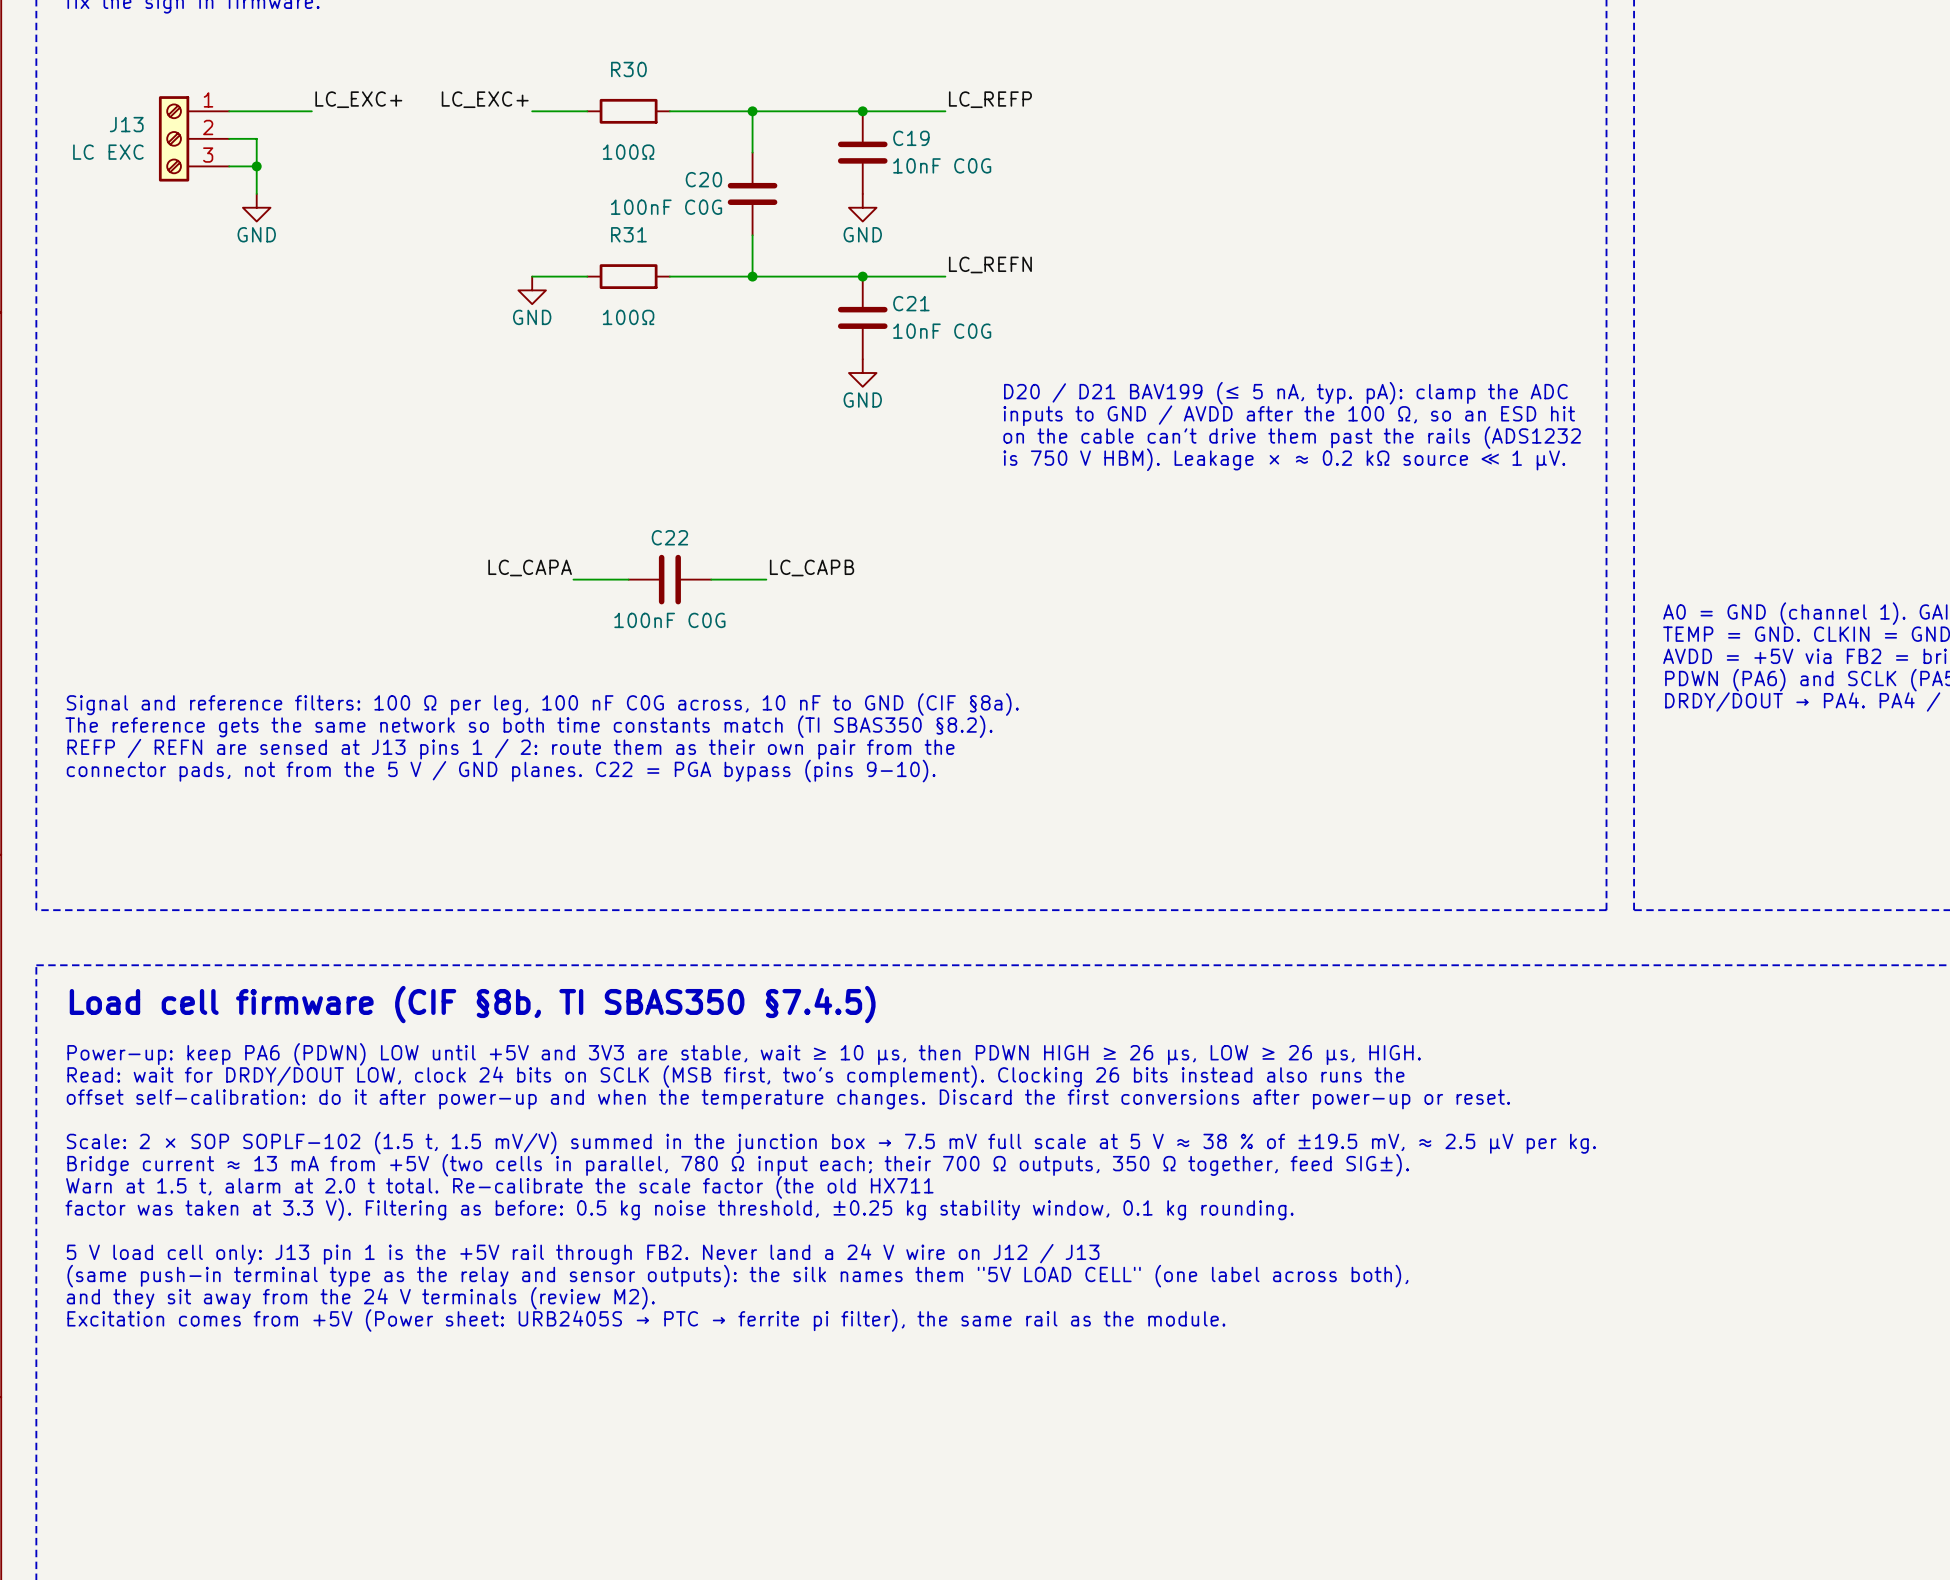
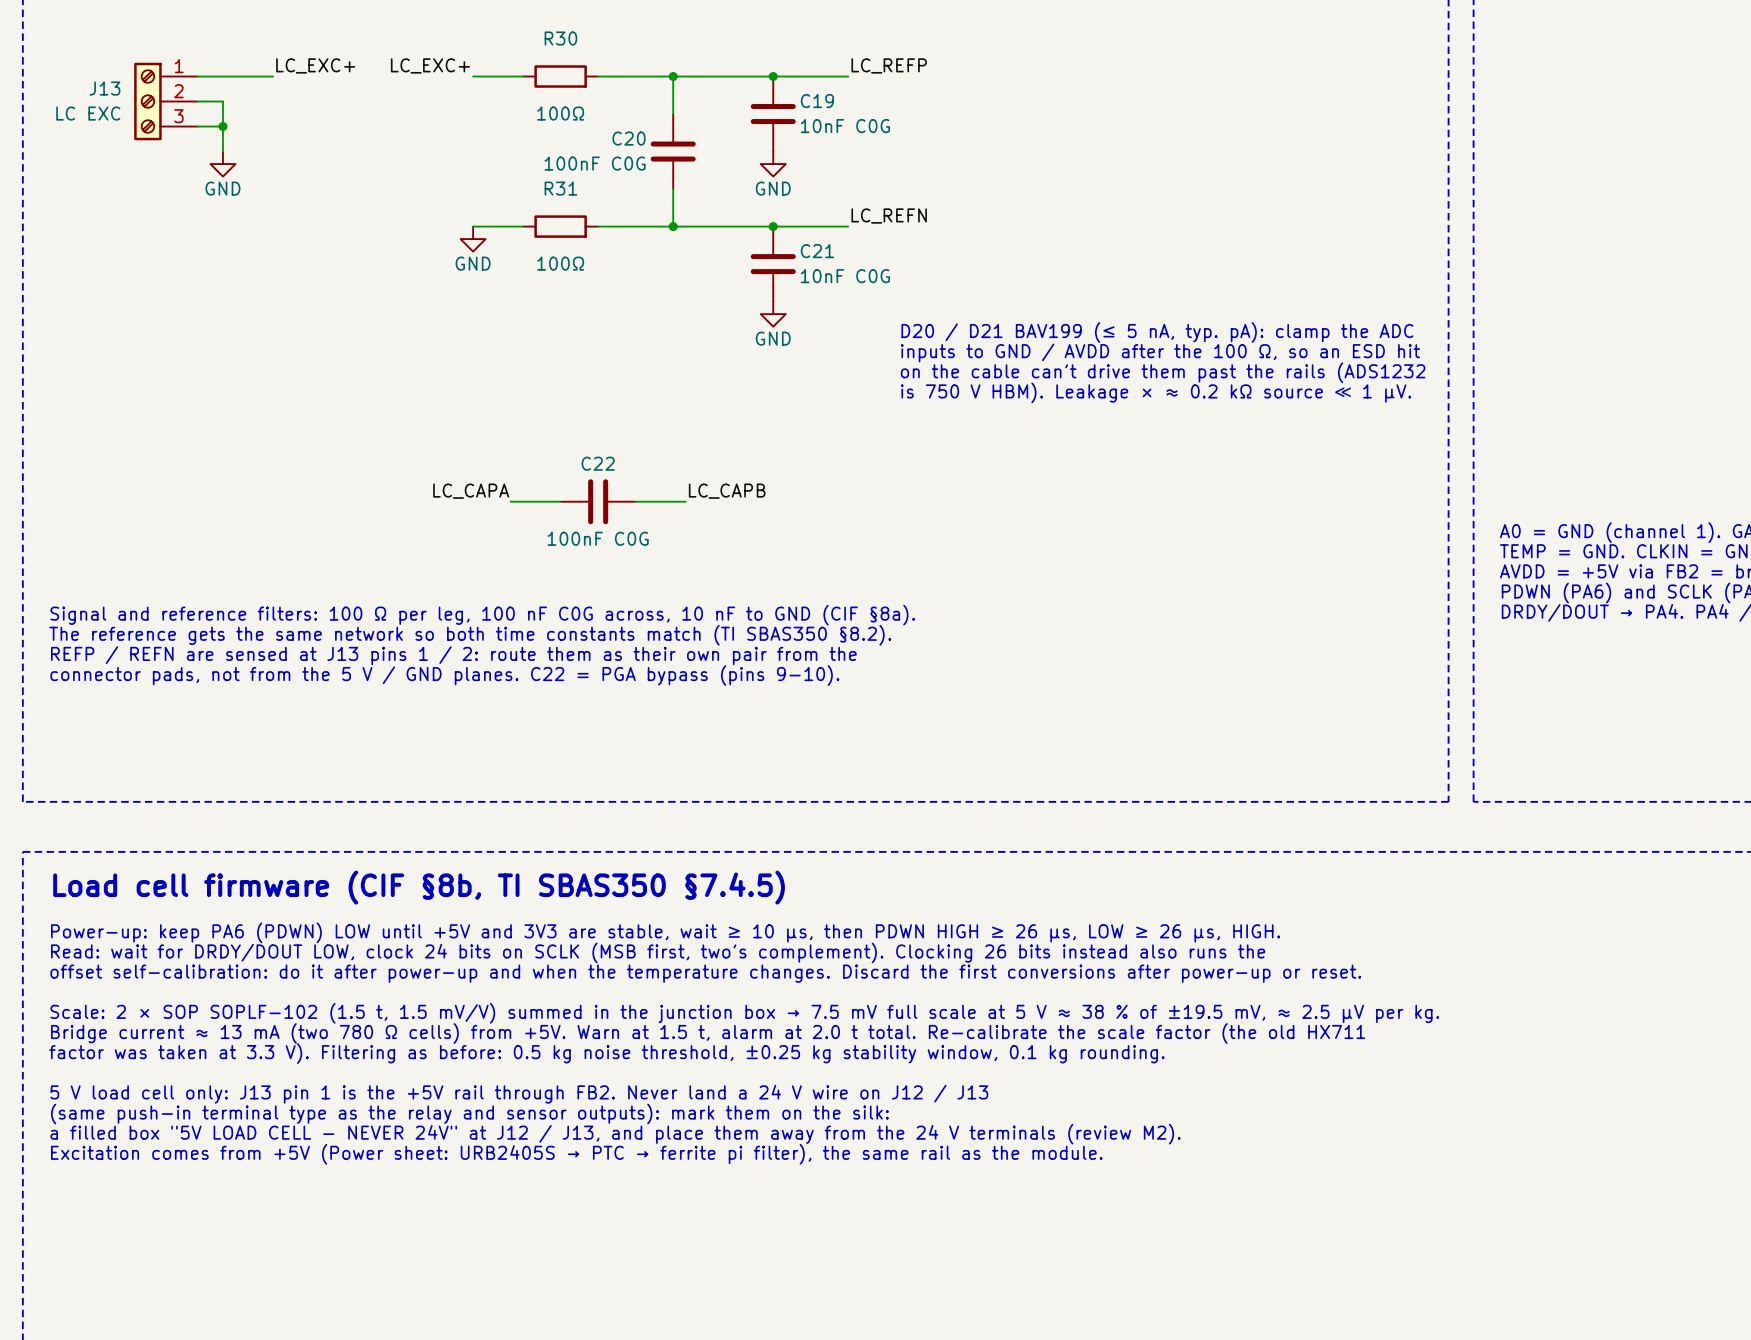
text: Bridge current ≈ 13 mA from +5V (two cells in parallel, 780 Ω input each; their 700 Ω outputs, 350 Ω together, feed SIG±). (738, 1165) -> Bridge current ≈ 13 mA (two 780 Ω cells) from +5V. Warn at 1.5 t, alarm at 2.0 t total. Re-calibrate the scale factor (the old HX711 (708, 1033)
text: Warn at 1.5 t, alarm at 2.0 t total. Re-calibrate the scale factor (the old HX711 (499, 1187) -> factor was taken at 3.3 V). Filtering as before: 0.5 kg noise threshold, ±0.25 kg stability window, 0.1 kg rounding. (606, 1053)
text: factor was taken at 3.3 V). Filtering as before: 0.5 kg noise threshold, ±0.25 kg stability window, 0.1 kg rounding. (679, 1209) -> none
text: none -> 5 V load cell only: J13 pin 1 is the +5V rail through FB2. Never land a 24 V wire on J12 / J13 (519, 1094)
text: 5 V load cell only: J13 pin 1 is the +5V rail through FB2. Never land a 24 V wire on J12 / J13 (583, 1254) -> (same push-in terminal type as the relay and sensor outputs): mark them on the silk: (469, 1114)
text: (same push-in terminal type as the relay and sensor outputs): the silk names them "5V LOAD CELL" (one label across both), (737, 1276) -> a filled box "5V LOAD CELL - NEVER 24V" at J12 / J13, and place them away from the 24 V terminals (review M2). (615, 1134)
text: and they sit away from the 24 V terminals (review M2). (360, 1298) -> Excitation comes from +5V (Power sheet: URB2405S → PTC → ferrite pi filter), the same rail as the module. (576, 1154)
text: Excitation comes from +5V (Power sheet: URB2405S → PTC → ferrite pi filter), the same rail as the module. (646, 1320) -> none

